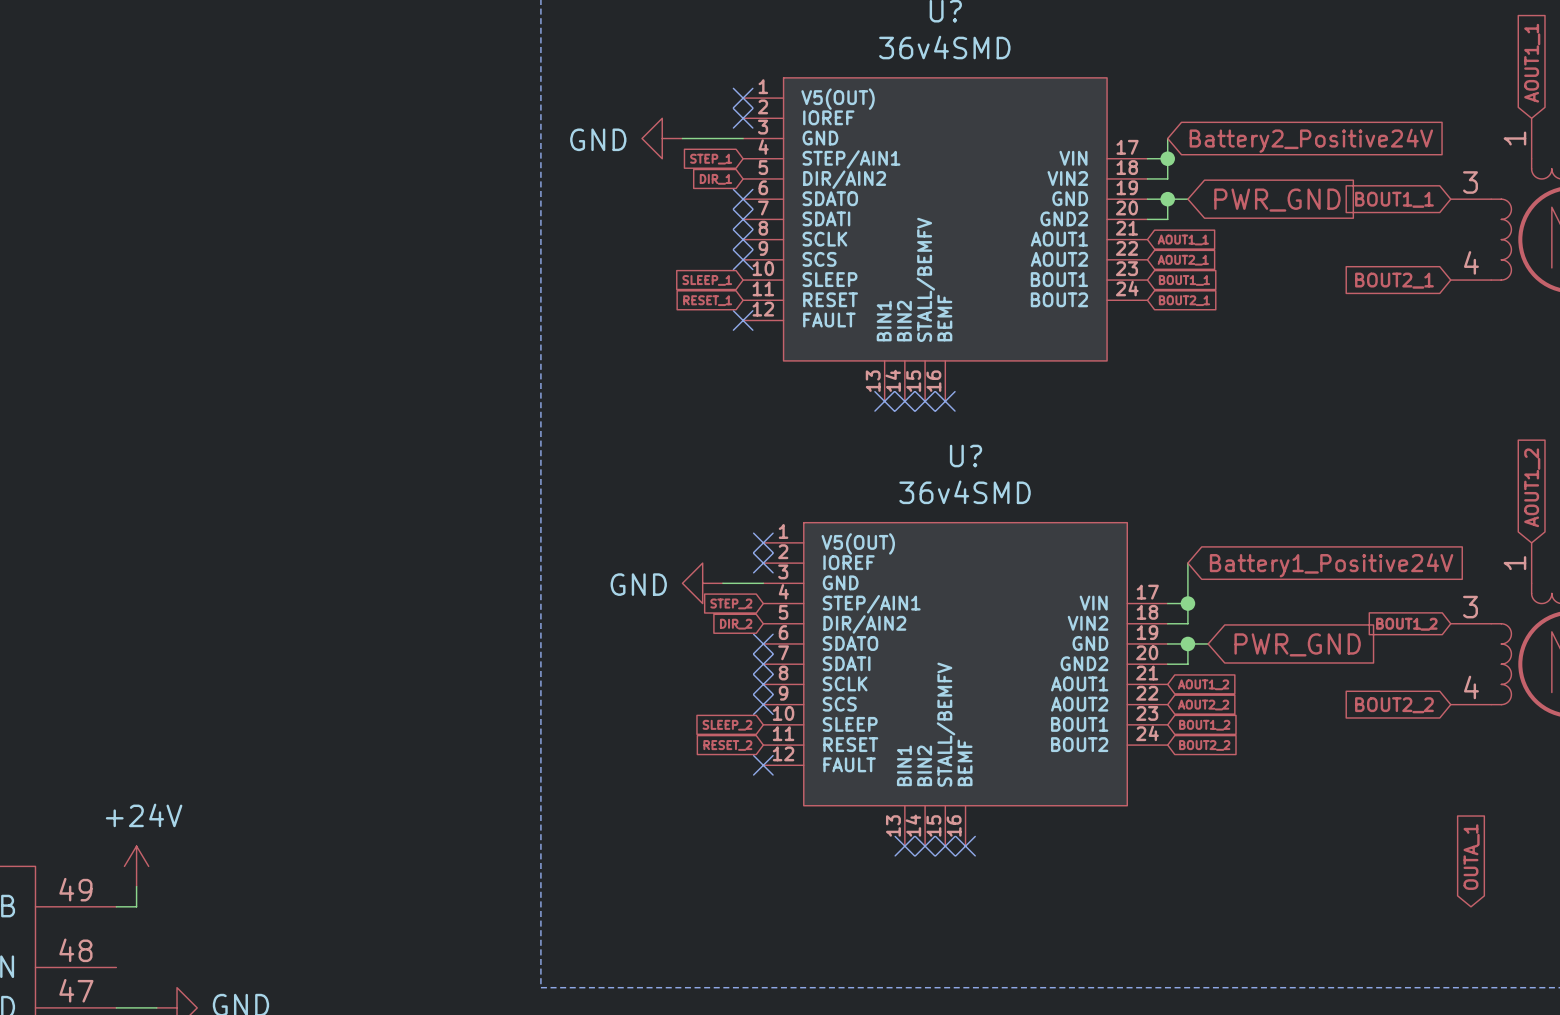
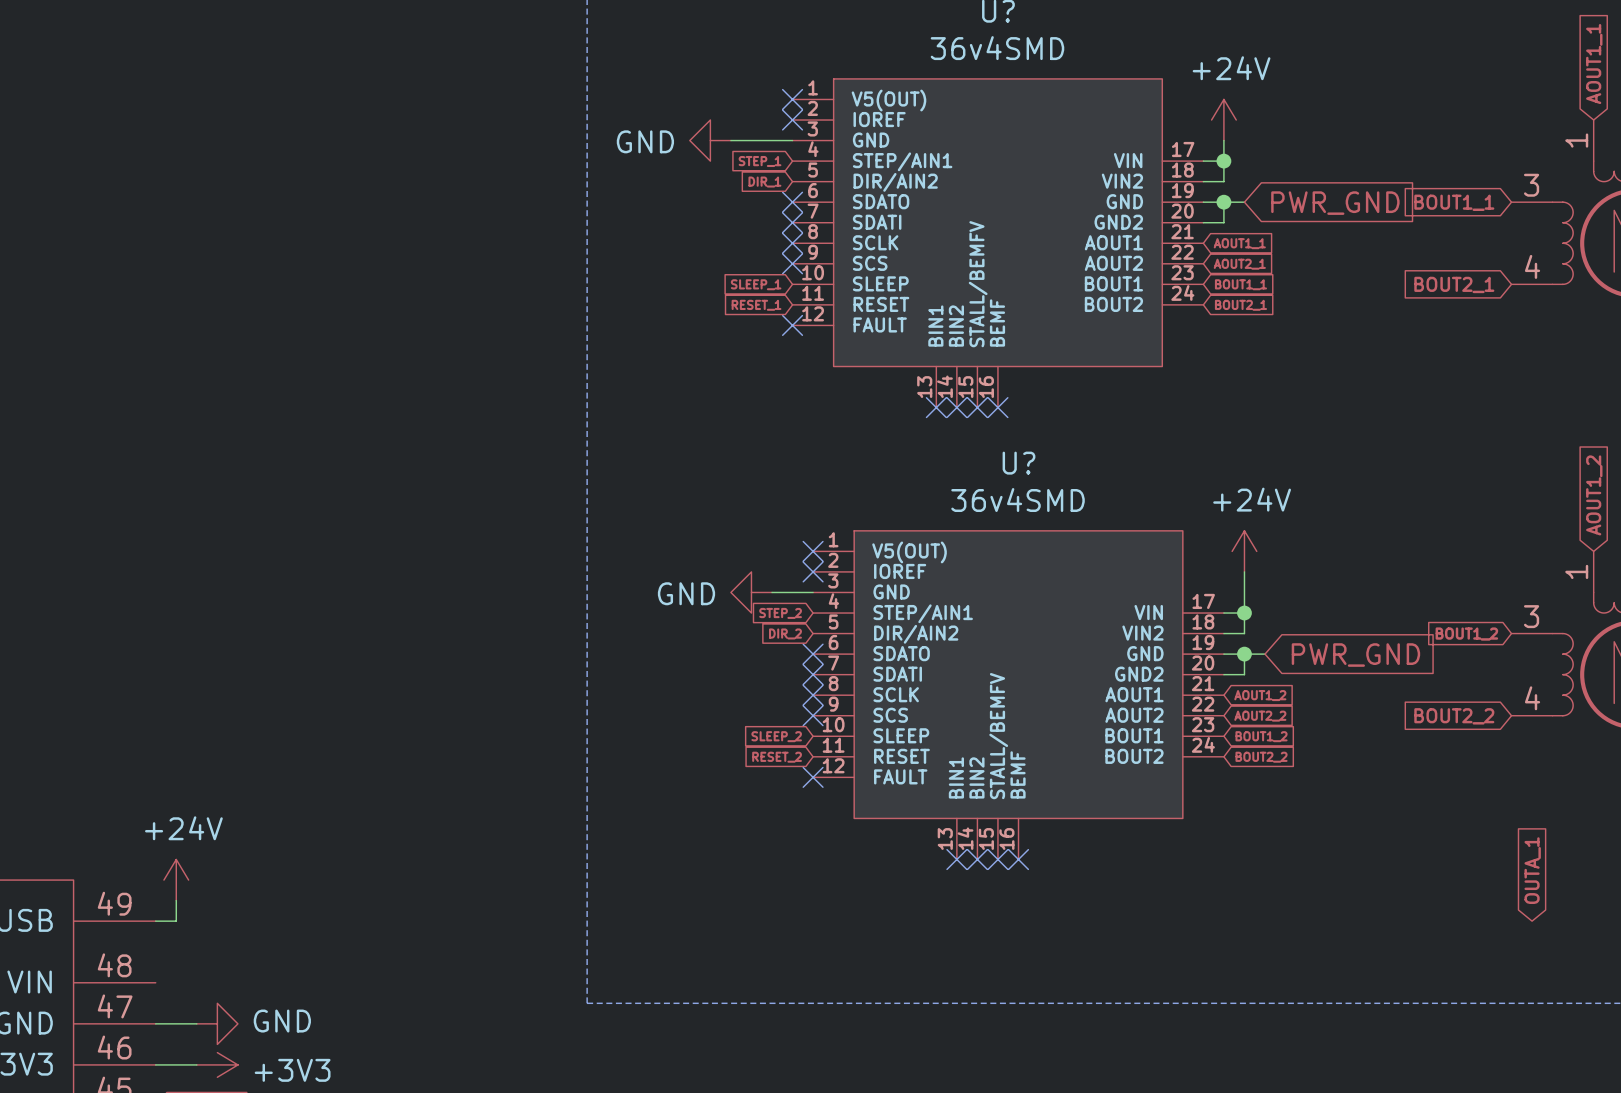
power symbol: none -> +24V (1223, 120)
global label: Battery2_Positive24V (1311, 140) -> none
power symbol: none -> +24V (1244, 551)
global label: Battery1_Positive24V (1331, 565) -> none

